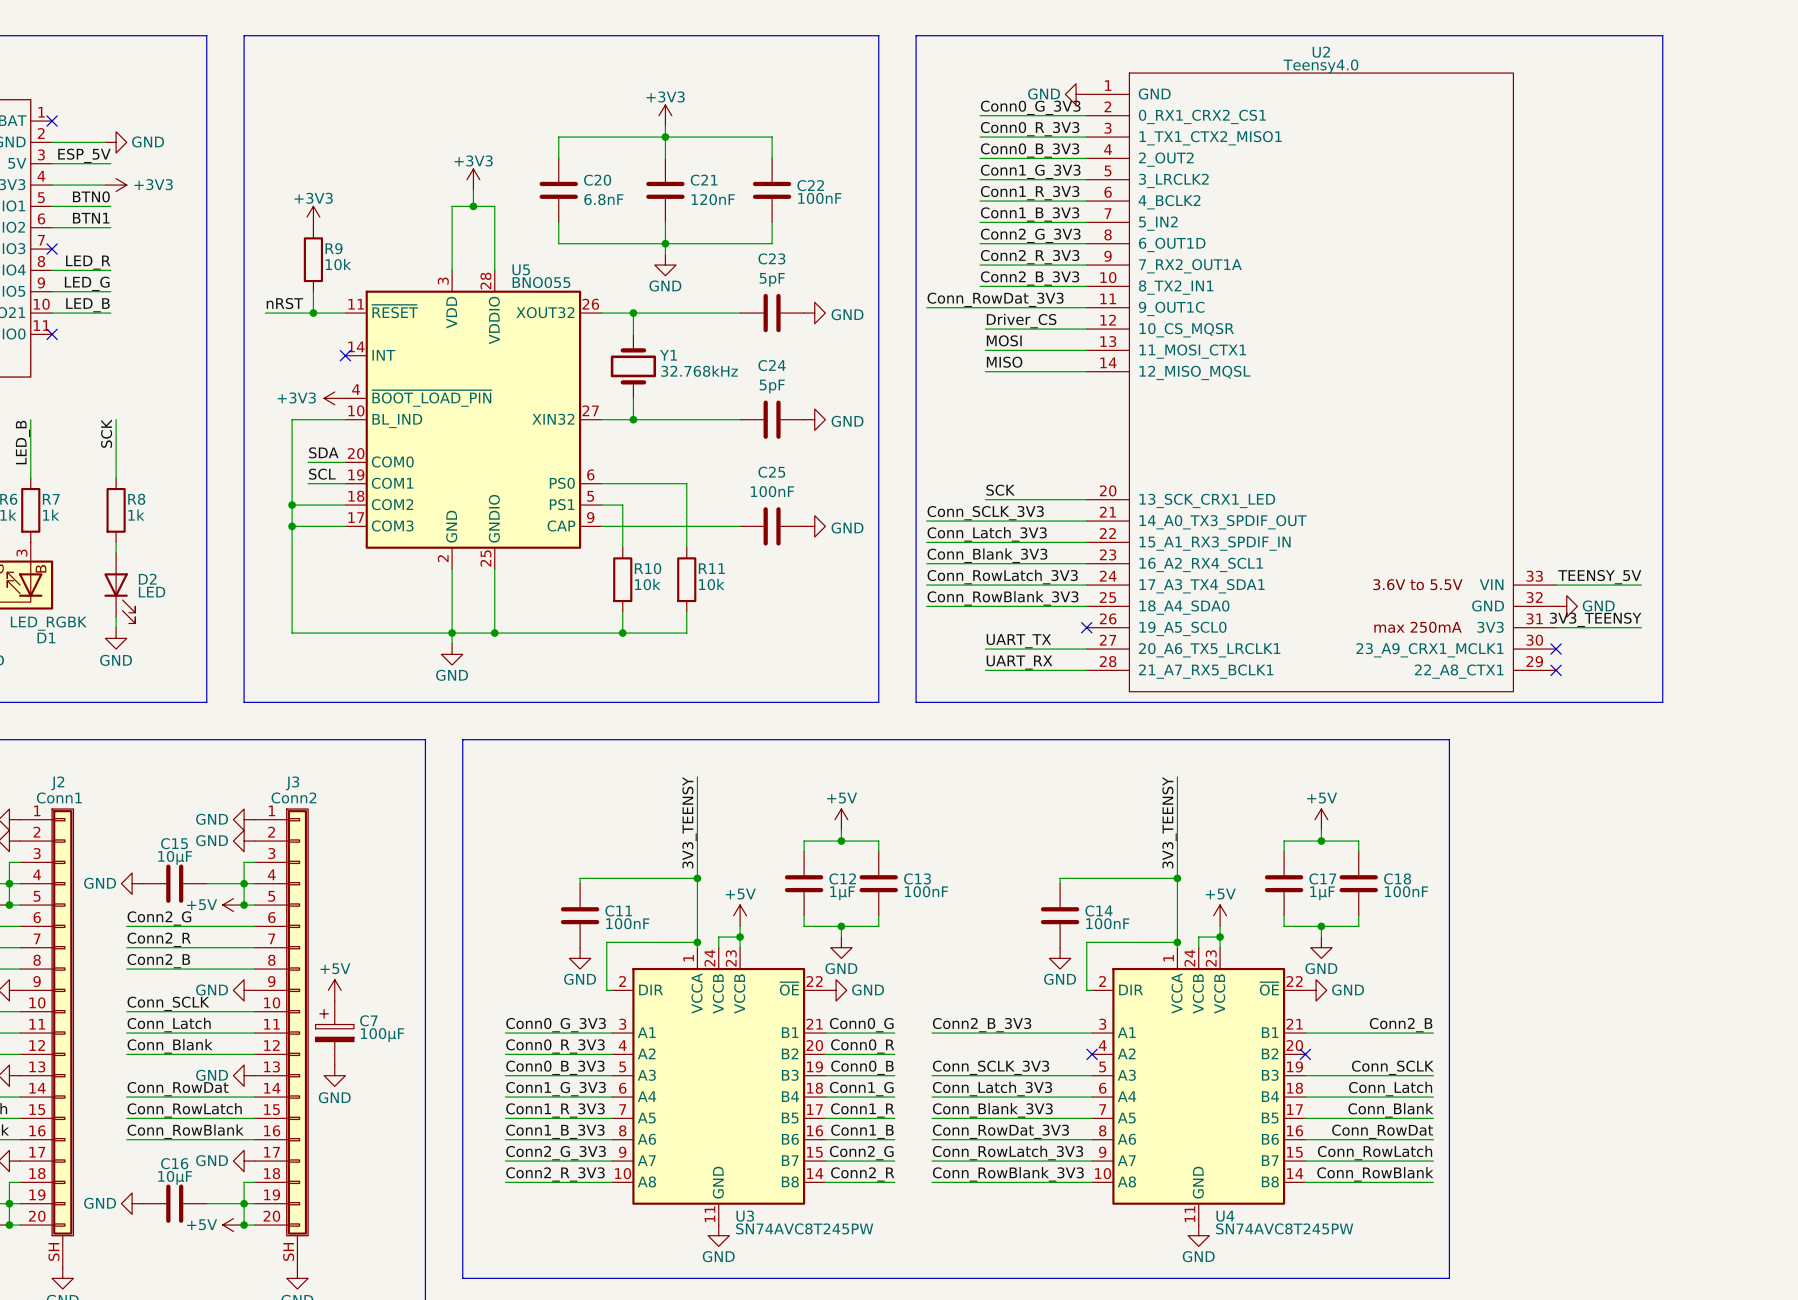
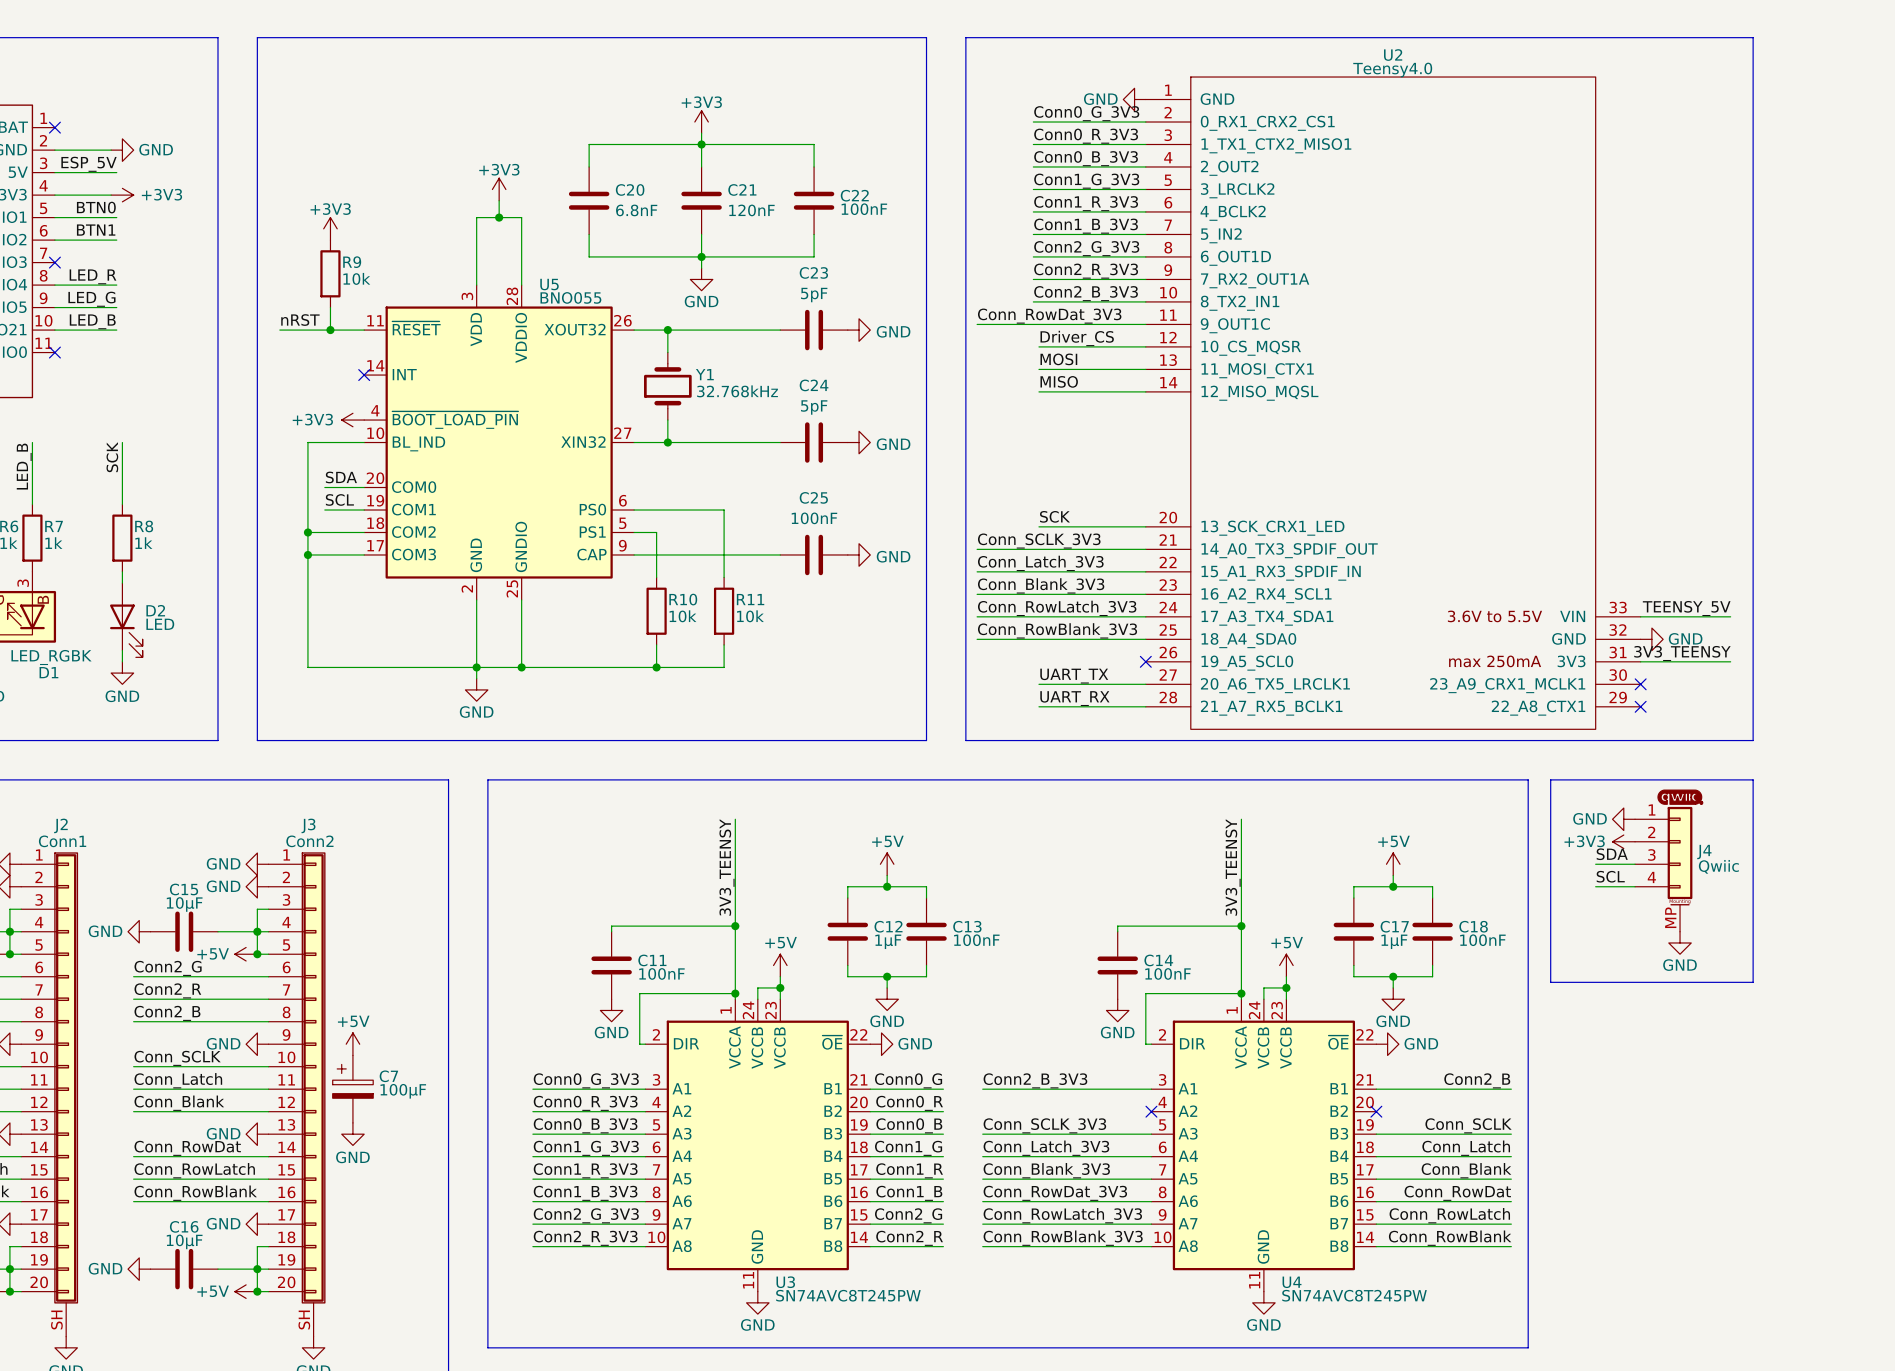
line: none -> (1550, 779) (1753, 779) (1753, 982) (1550, 982) (1550, 779)
part: none -> (1680, 797)
power symbol: none -> GND (1623, 819)
power symbol: none -> +3V3 (1623, 841)
label: none -> SDA (1612, 854)
wire: none -> (1595, 864) (1635, 864)
J4: none -> Qwiic (1663, 869)
label: none -> SCL (1610, 876)
wire: none -> (1595, 886) (1635, 886)
power symbol: none -> GND (1680, 942)

